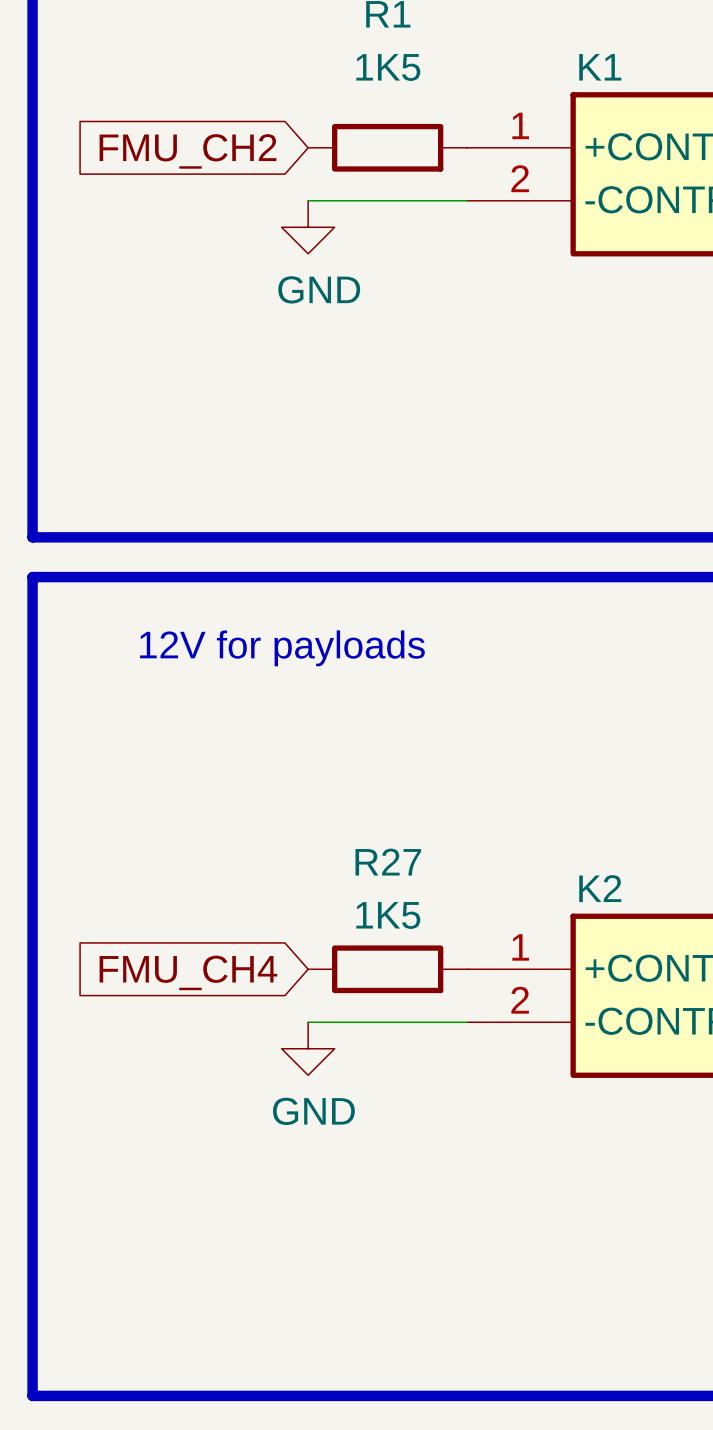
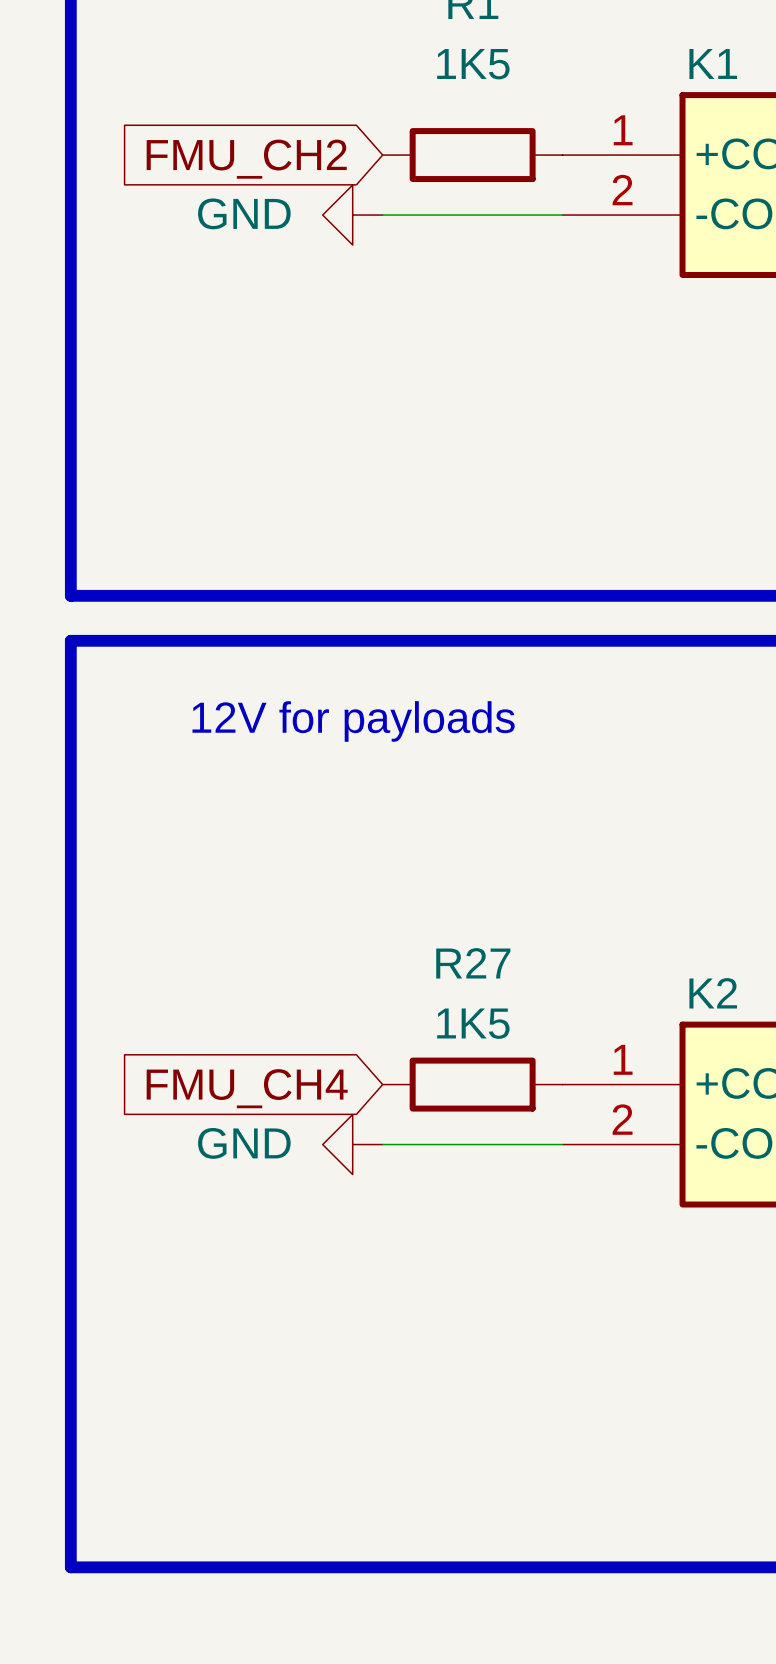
power symbol rotation: 0° (308, 227) -> 90° clockwise (352, 215)
power symbol position: GND (308, 227) -> GND (352, 215)
power symbol text position: GND (319, 289) -> GND (244, 213)
power symbol rotation: 0° (308, 1048) -> 90° clockwise (352, 1144)
power symbol position: GND (308, 1048) -> GND (352, 1144)

